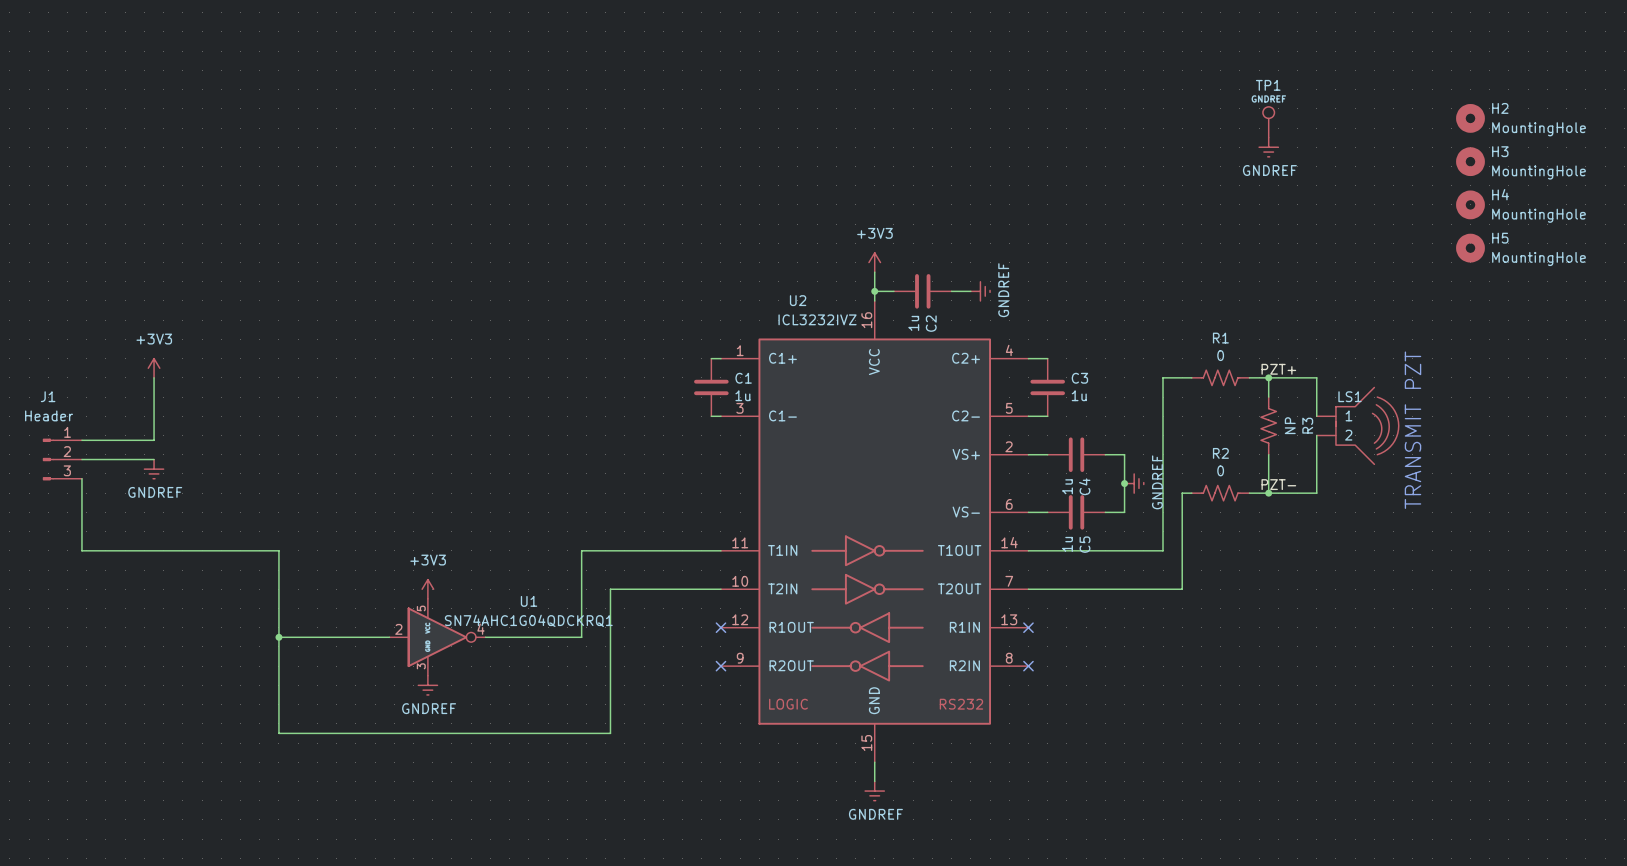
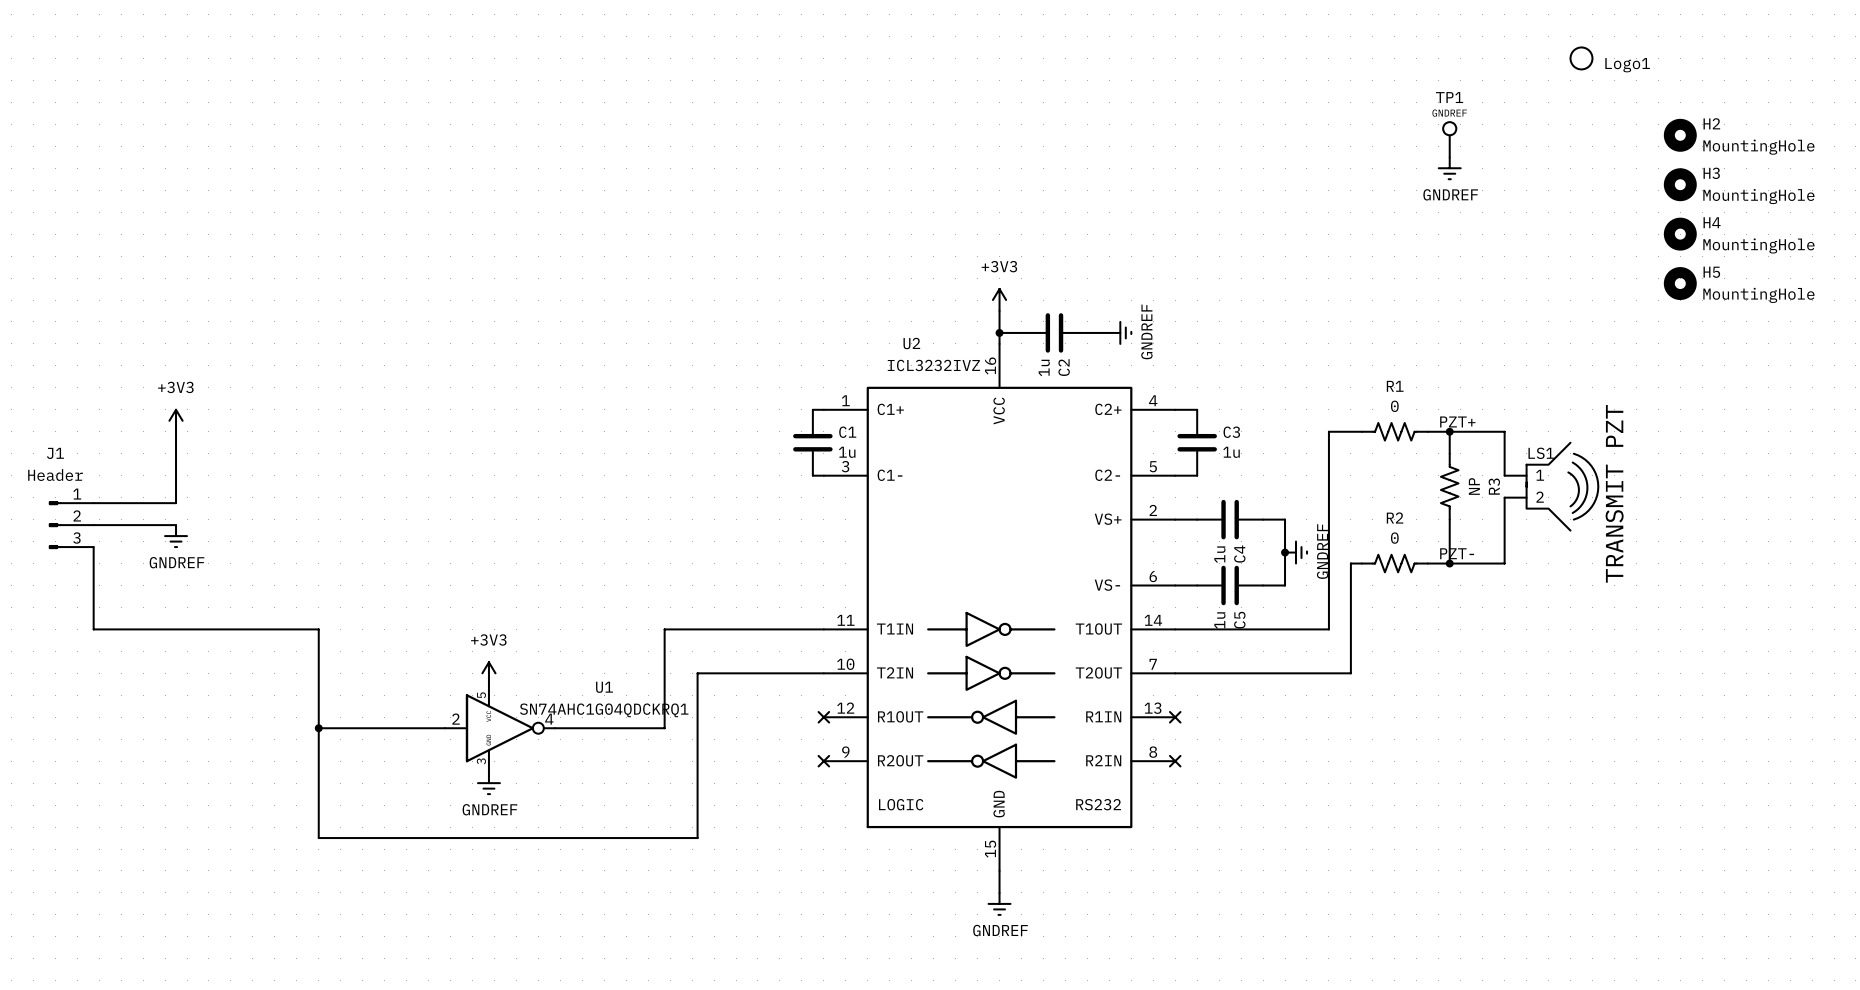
Logo1: none -> (1581, 58)

